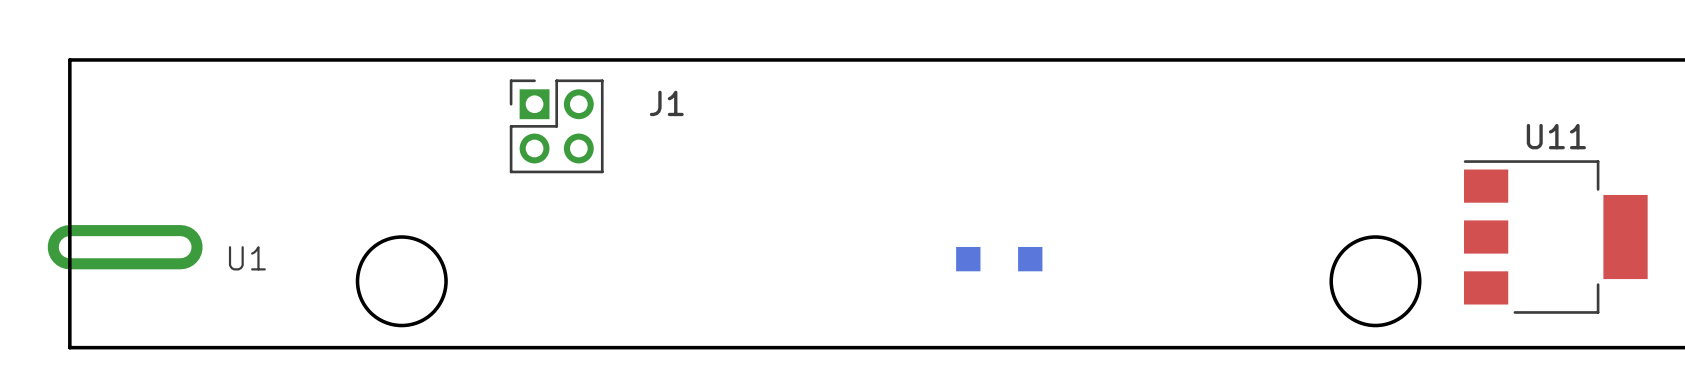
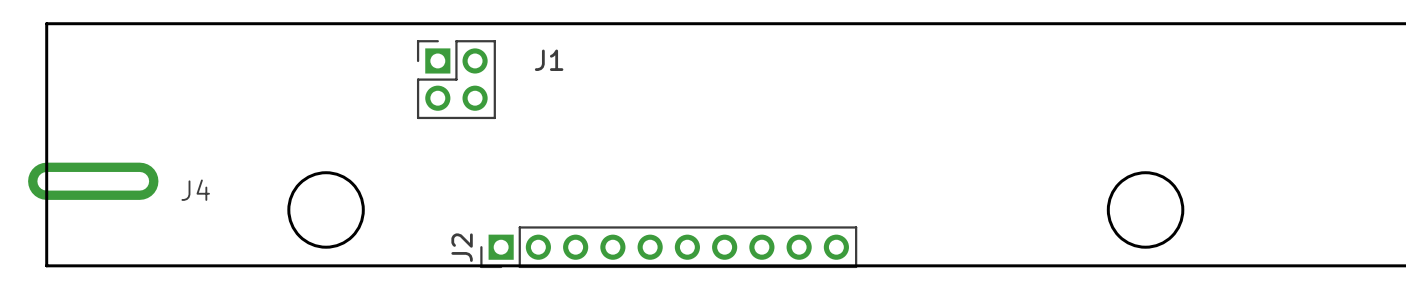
U11: (1555, 237) -> none
U1 name: U1 (247, 258) -> J4 (195, 190)
part: (999, 259) -> none
J2: none -> (668, 247)

